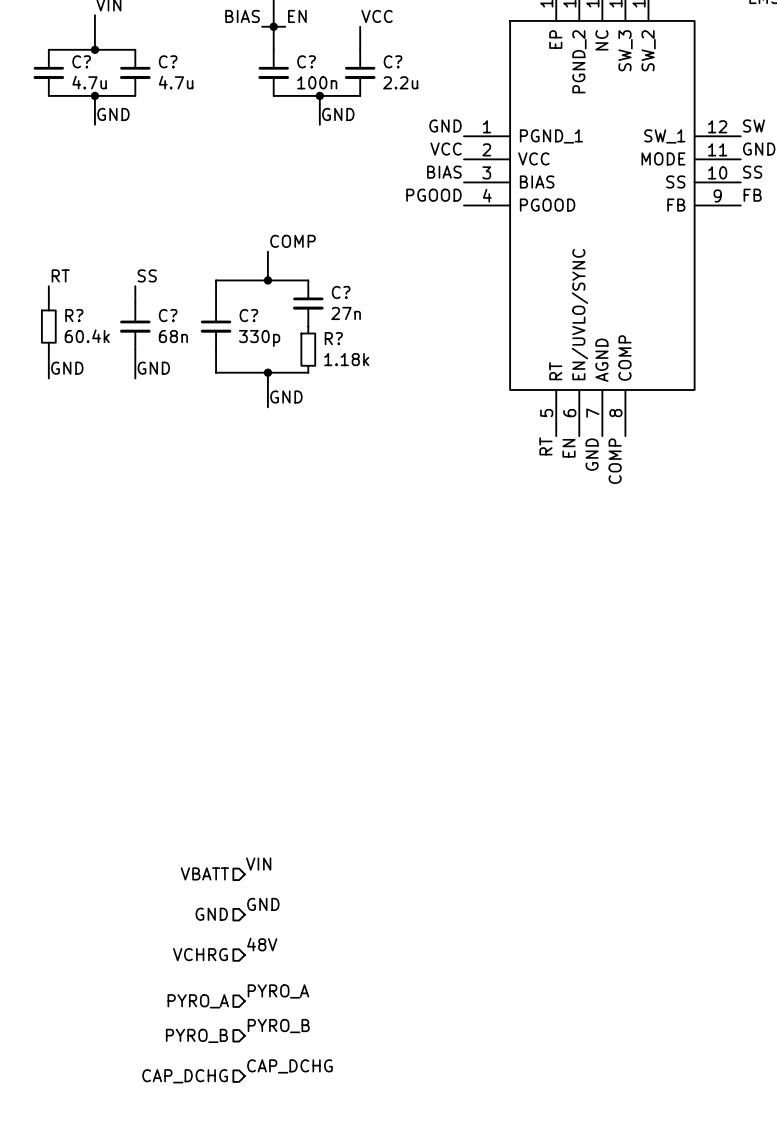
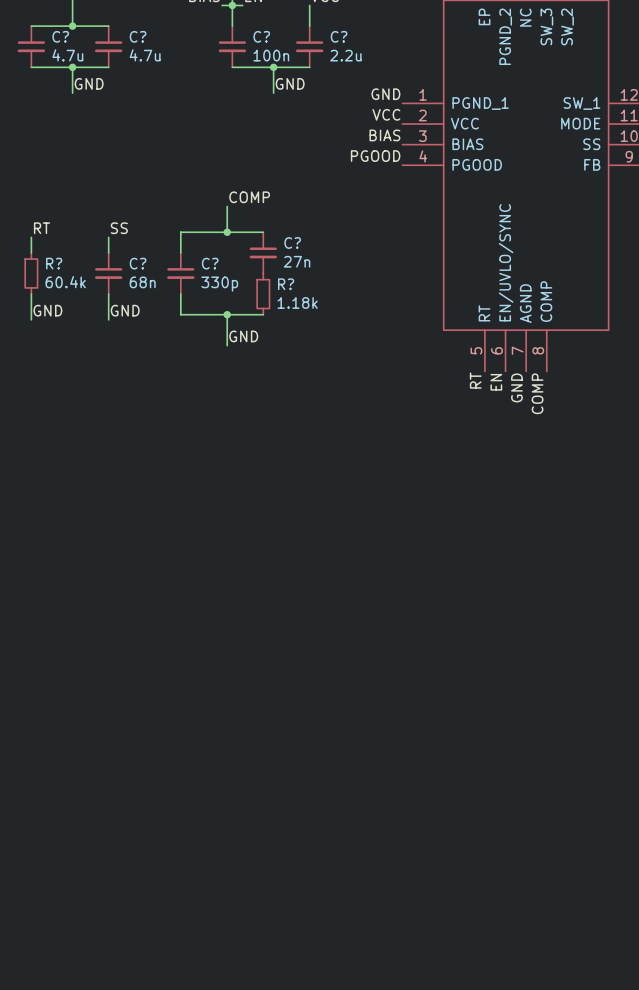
label: VIN (258, 864) -> none
hierarchical label: VBATT (204, 873) -> none
label: GND (263, 904) -> none
hierarchical label: GND (211, 914) -> none
label: 48V (262, 944) -> none
hierarchical label: VCHRG (200, 954) -> none
label: PYRO_A (278, 991) -> none
hierarchical label: PYRO_A (198, 1001) -> none
label: PYRO_B (278, 1026) -> none
hierarchical label: PYRO_B (196, 1035) -> none
label: CAP_DCHG (289, 1066) -> none
hierarchical label: CAP_DCHG (185, 1076) -> none

